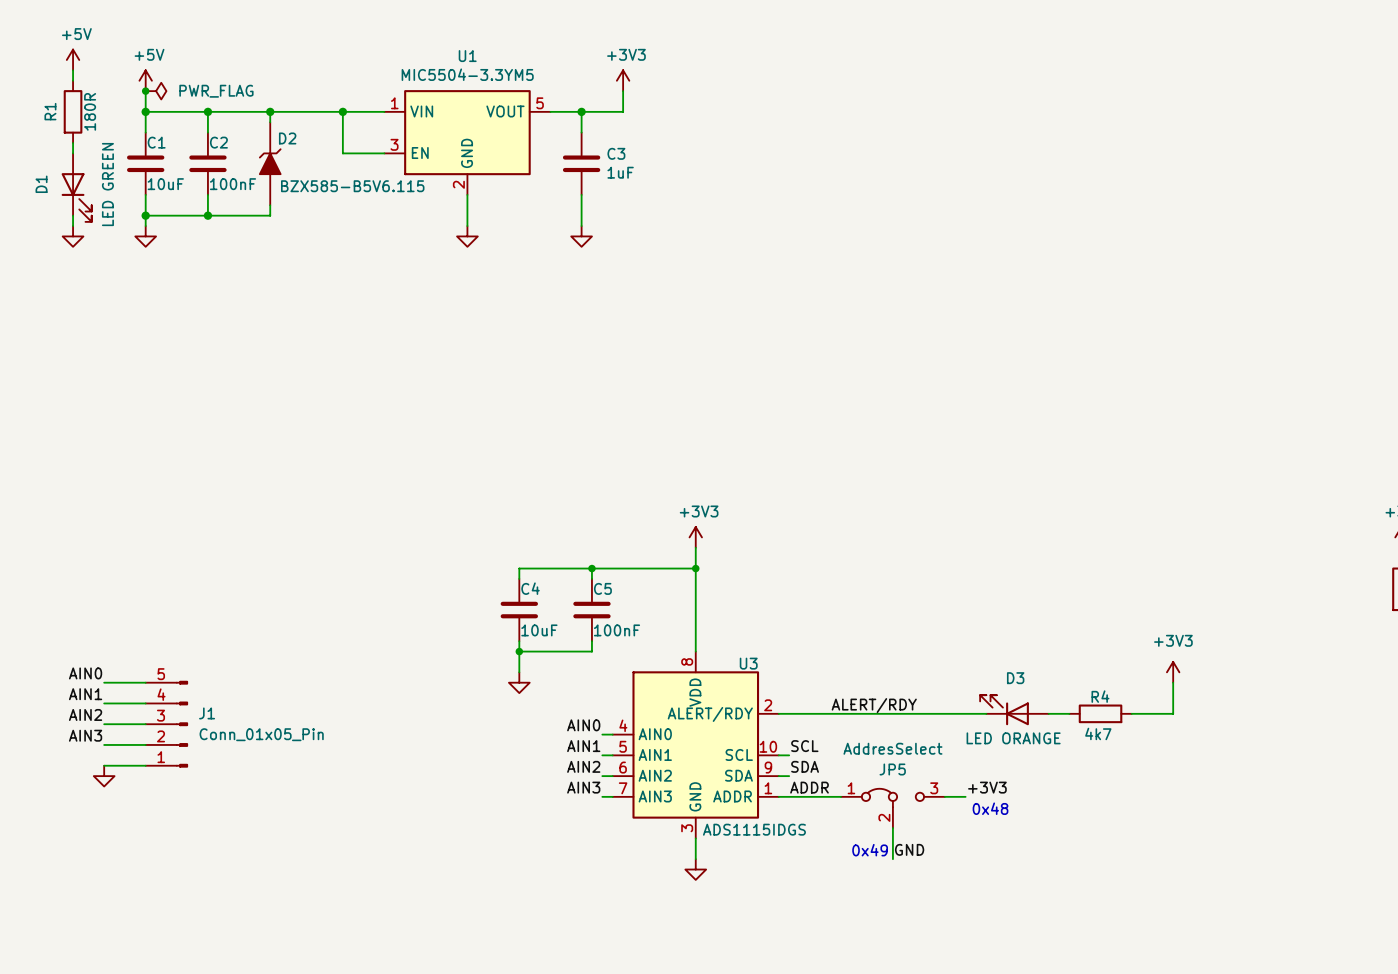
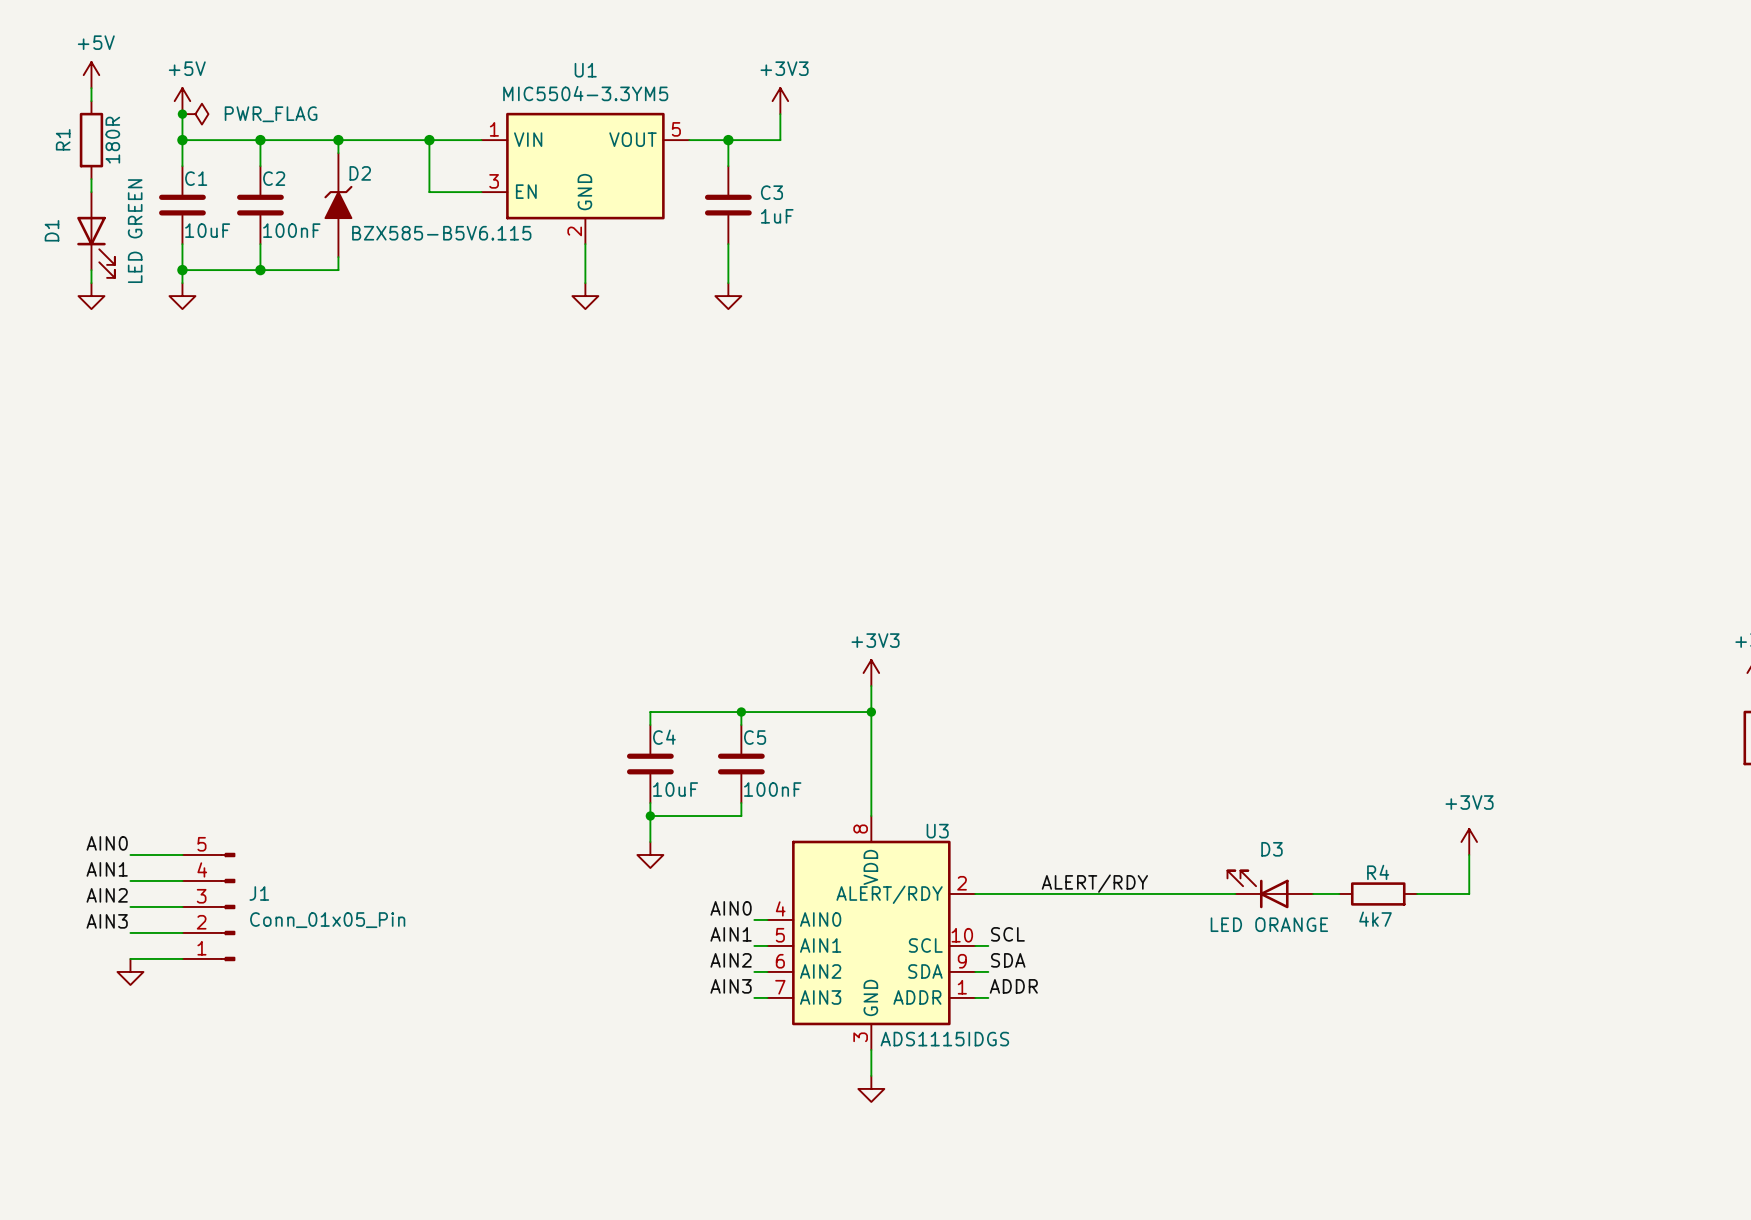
label: +3V3 (987, 787) -> none
wire: (789, 796) (841, 796) -> none
wire: (944, 796) (965, 796) -> none
JP5: AddresSelect (892, 808) -> none
text: 0x48 (990, 808) -> none
wire: (892, 828) (892, 859) -> none
label: GND (909, 849) -> none
text: 0x49 (870, 850) -> none

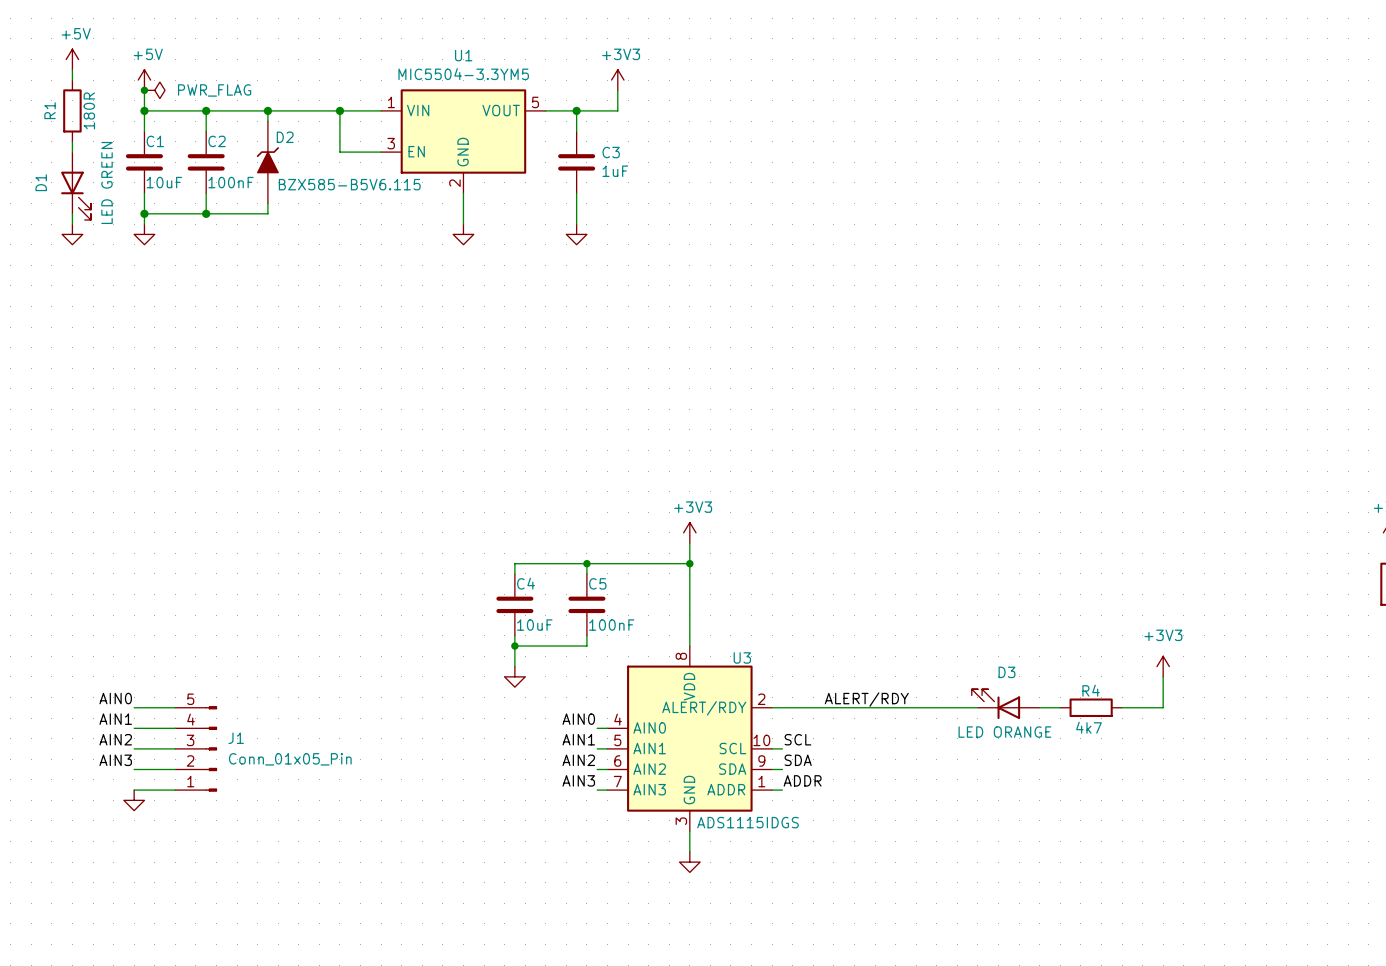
label position: AIN0 (107, 843) -> AIN0 (115, 698)
wire: (130, 854) (182, 854) -> (134, 790) (175, 790)
label position: AIN1 (107, 869) -> AIN1 (115, 719)
wire: (130, 880) (182, 880) -> (134, 707) (175, 707)
label position: AIN2 (107, 895) -> AIN2 (115, 739)
wire: (130, 906) (182, 906) -> (134, 728) (175, 728)
J1 position: (208, 906) -> (196, 748)
label position: AIN3 (107, 921) -> AIN3 (115, 760)
wire: (130, 932) (182, 932) -> (134, 748) (175, 748)
wire: (130, 958) (182, 958) -> (134, 769) (175, 769)
power symbol position: (130, 971) -> (134, 800)

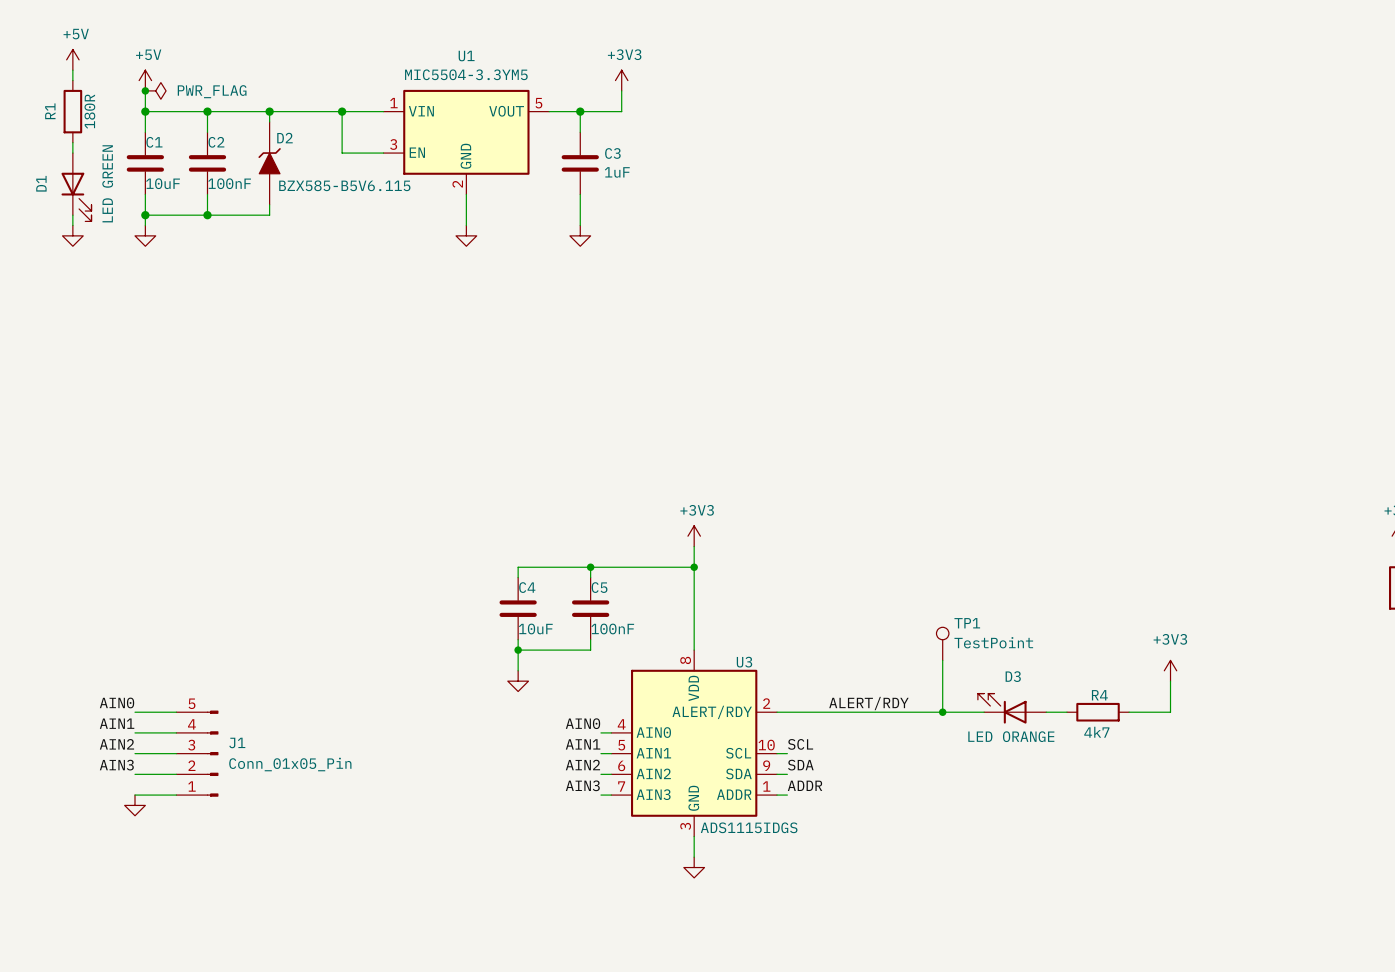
TP1: none -> TestPoint (942, 643)
wire: none -> (942, 660) (942, 712)
junction: none -> (942, 712)

